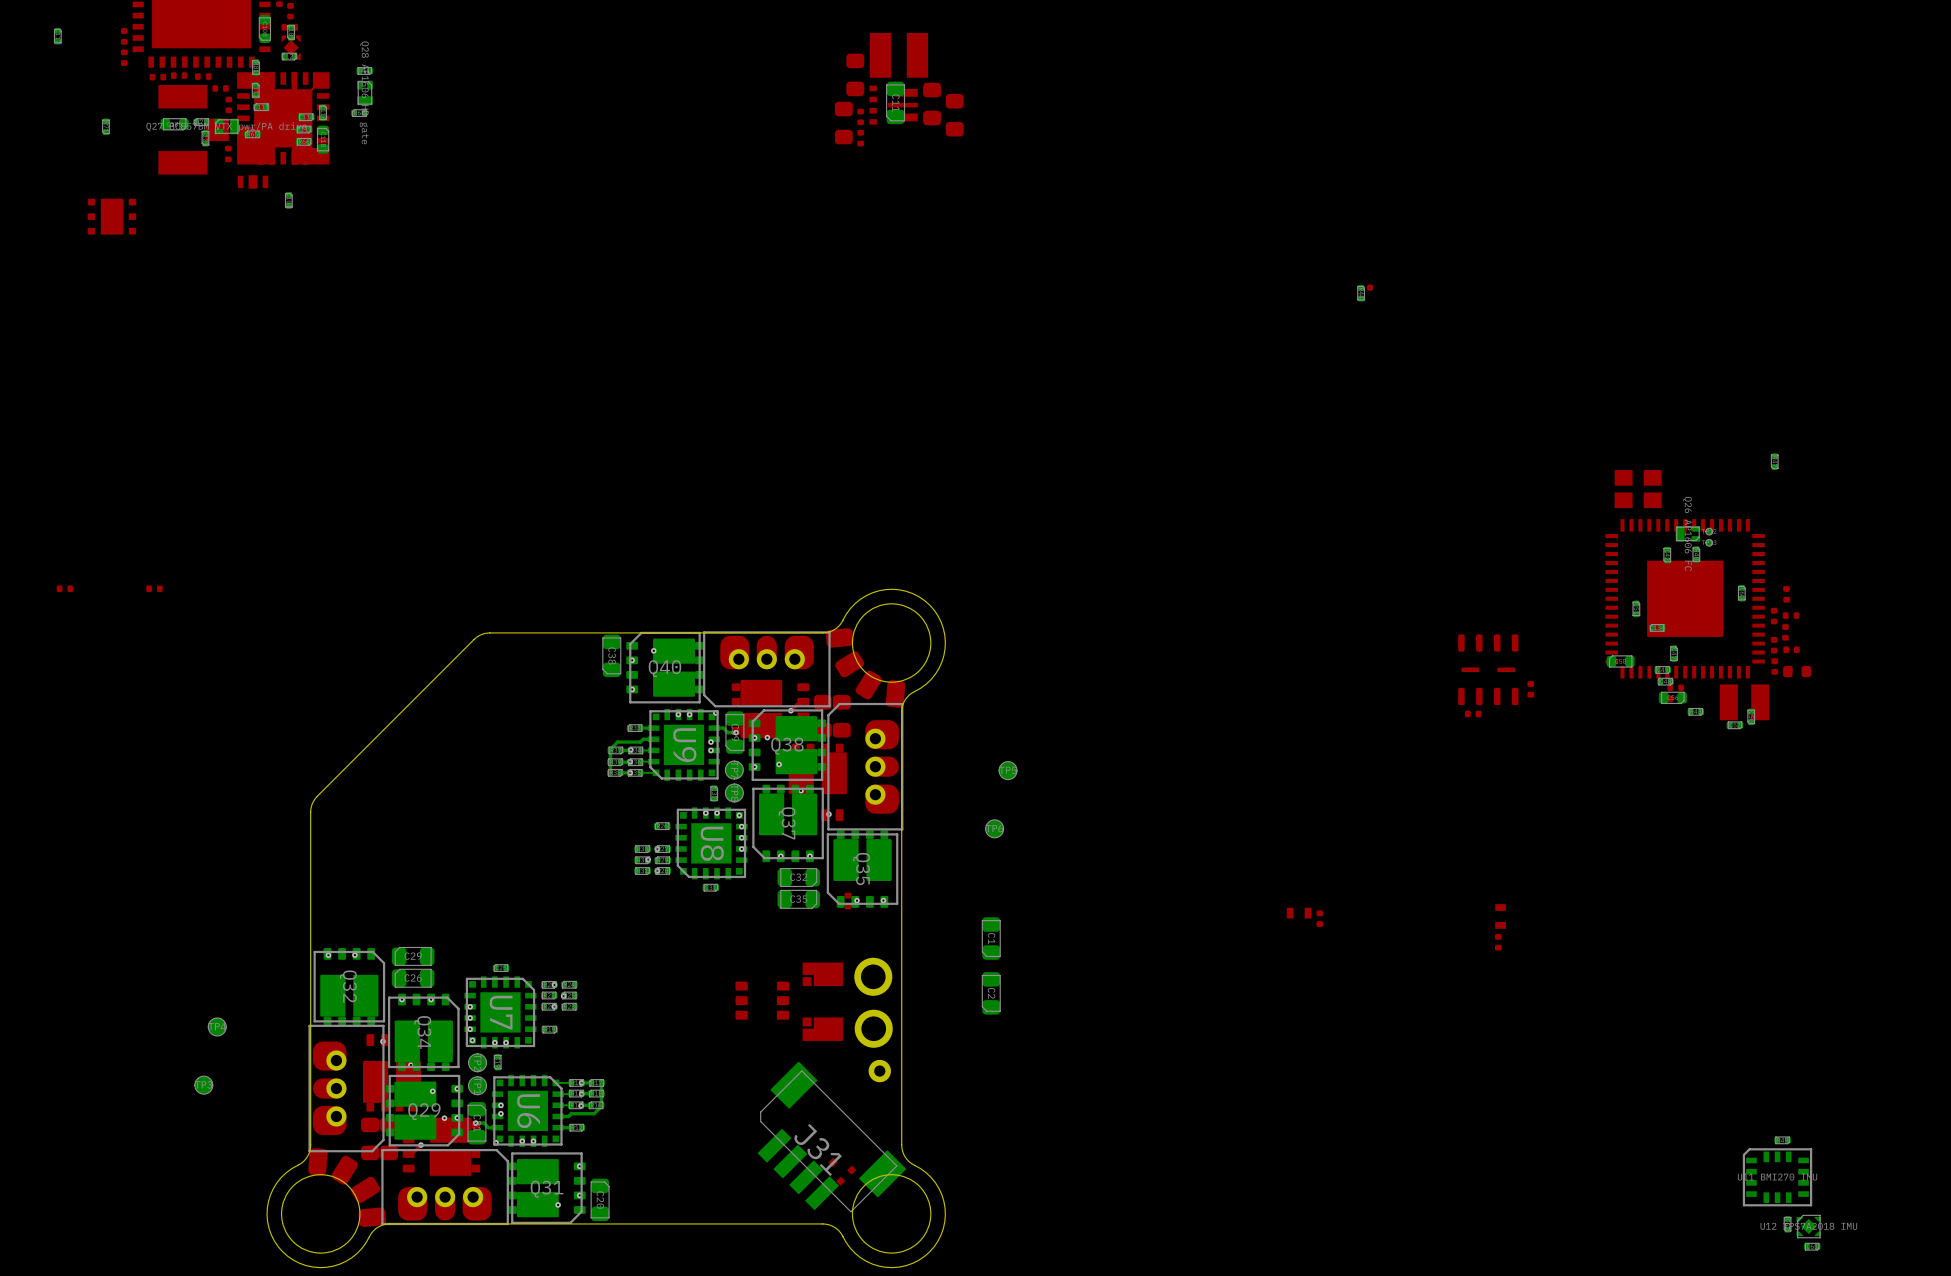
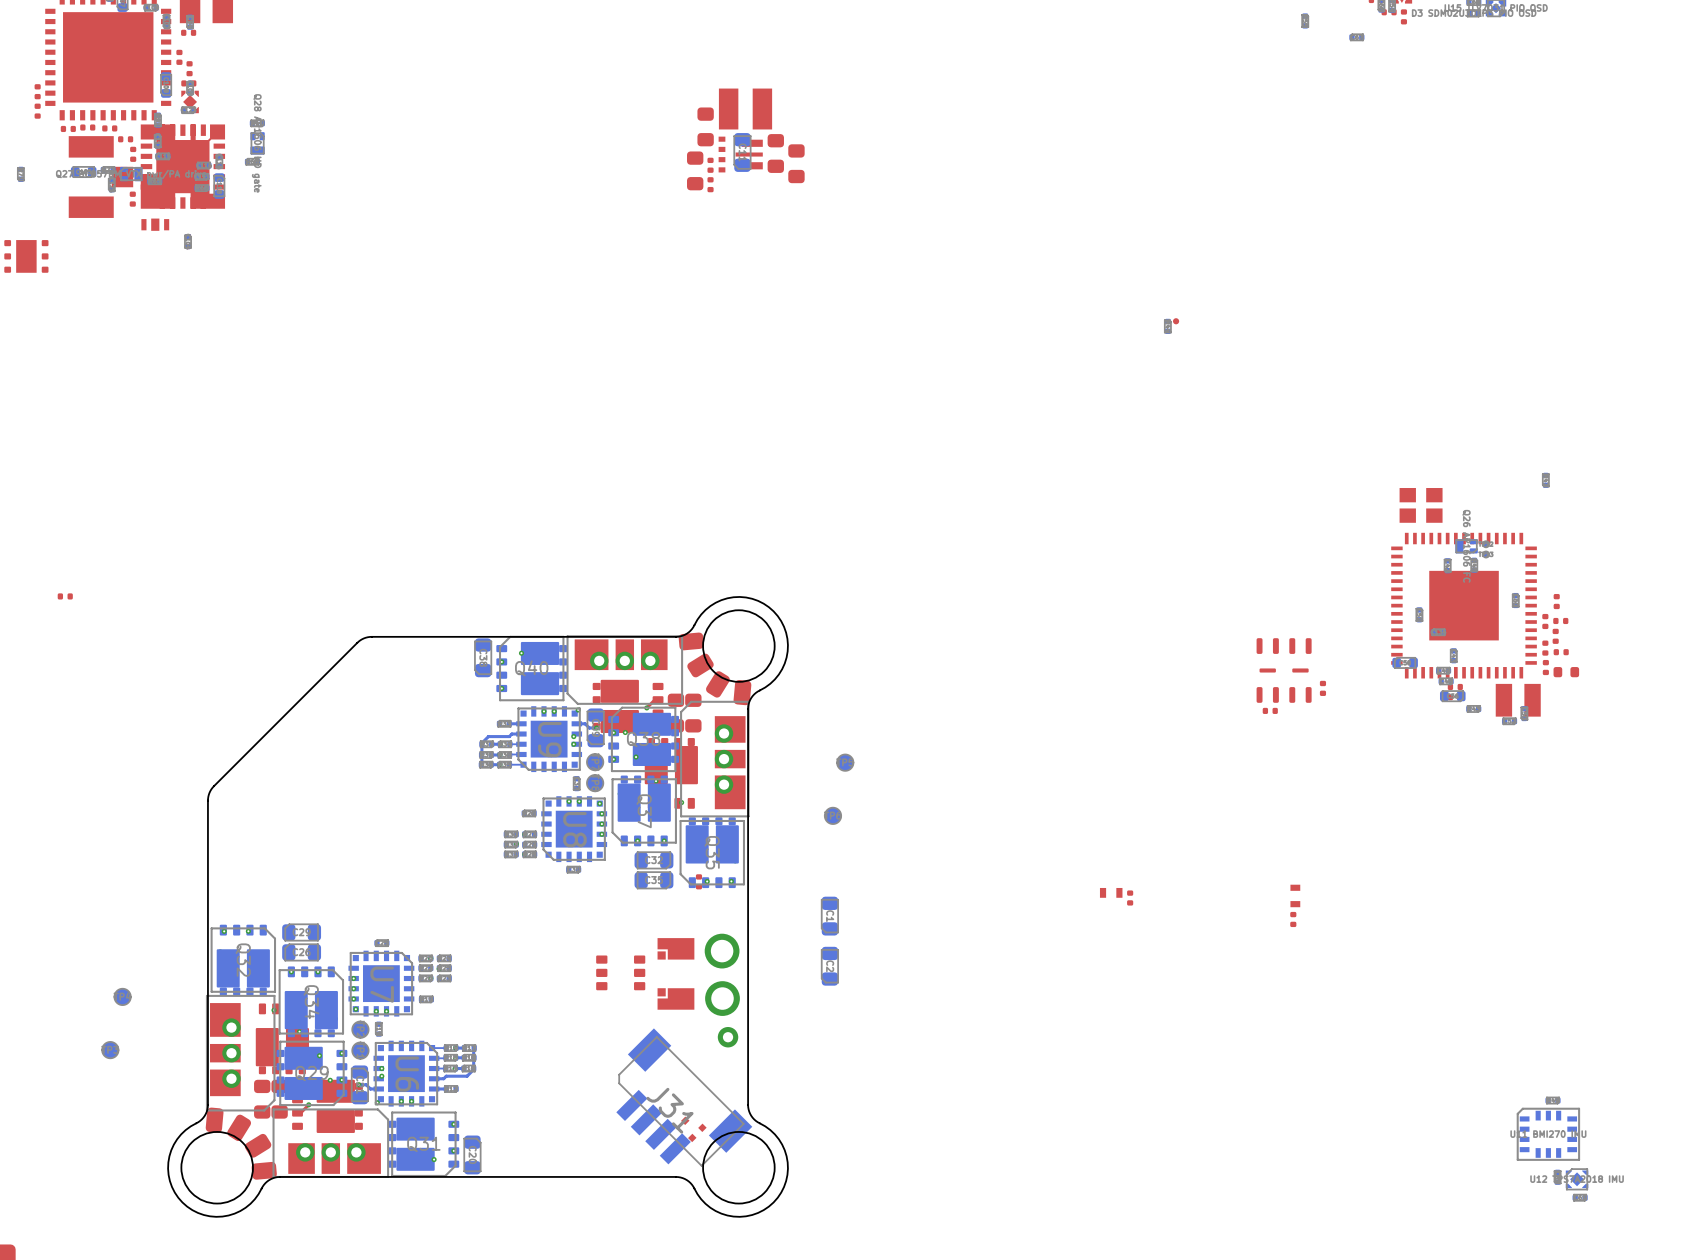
part footprint: [703, 631, 831, 708] -> [566, 635, 684, 705]
part footprint: [827, 702, 904, 831] -> [680, 700, 750, 818]
part footprint: [308, 1024, 385, 1153] -> [205, 994, 276, 1112]
part footprint: [381, 1148, 509, 1226] -> [272, 1108, 390, 1178]

